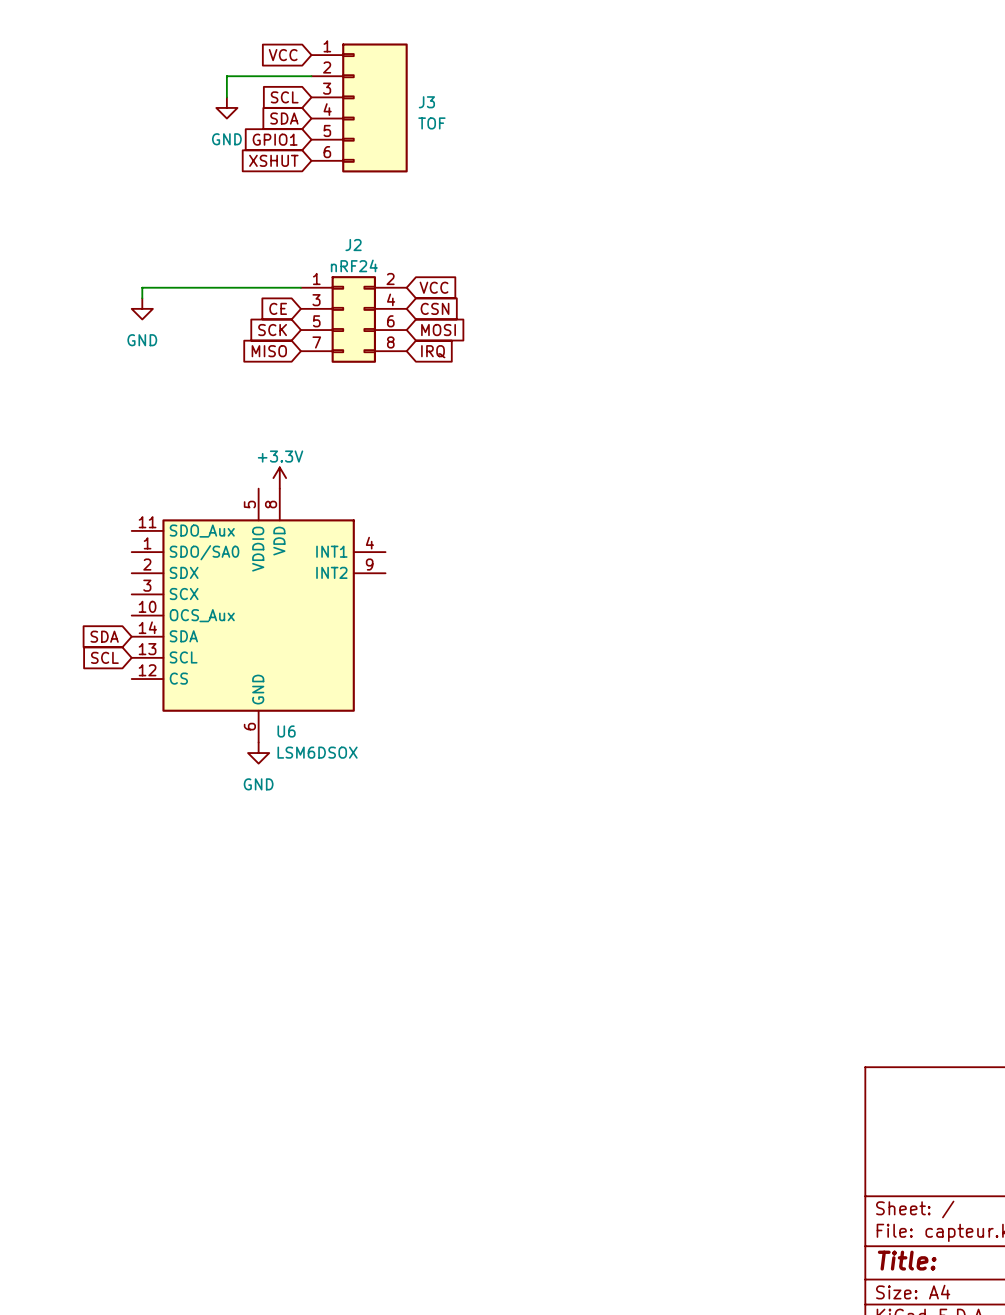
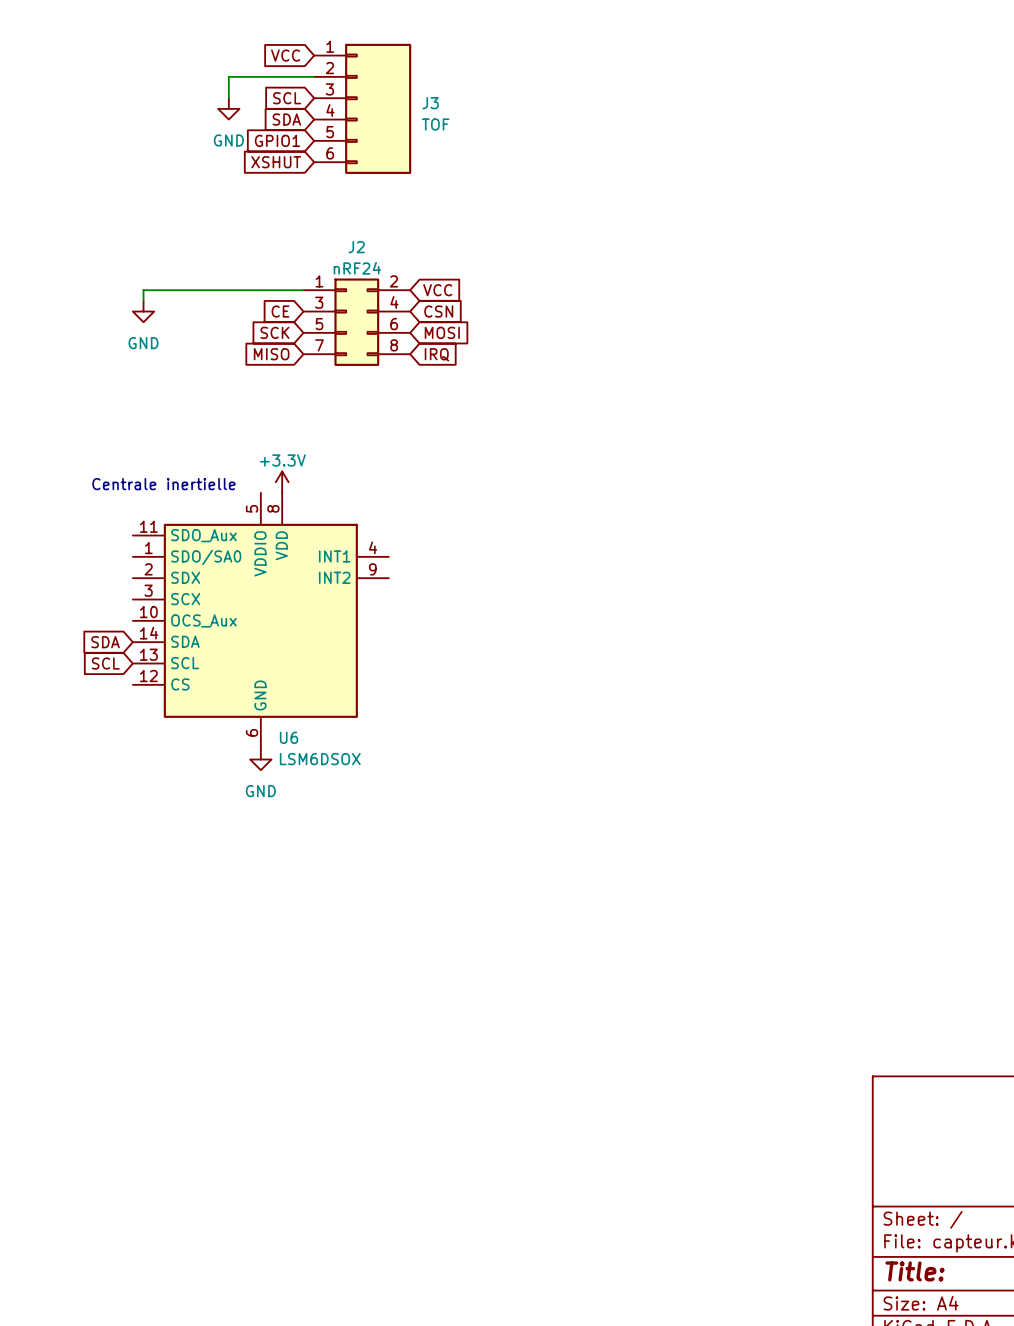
text: none -> Centrale inertielle (163, 484)

